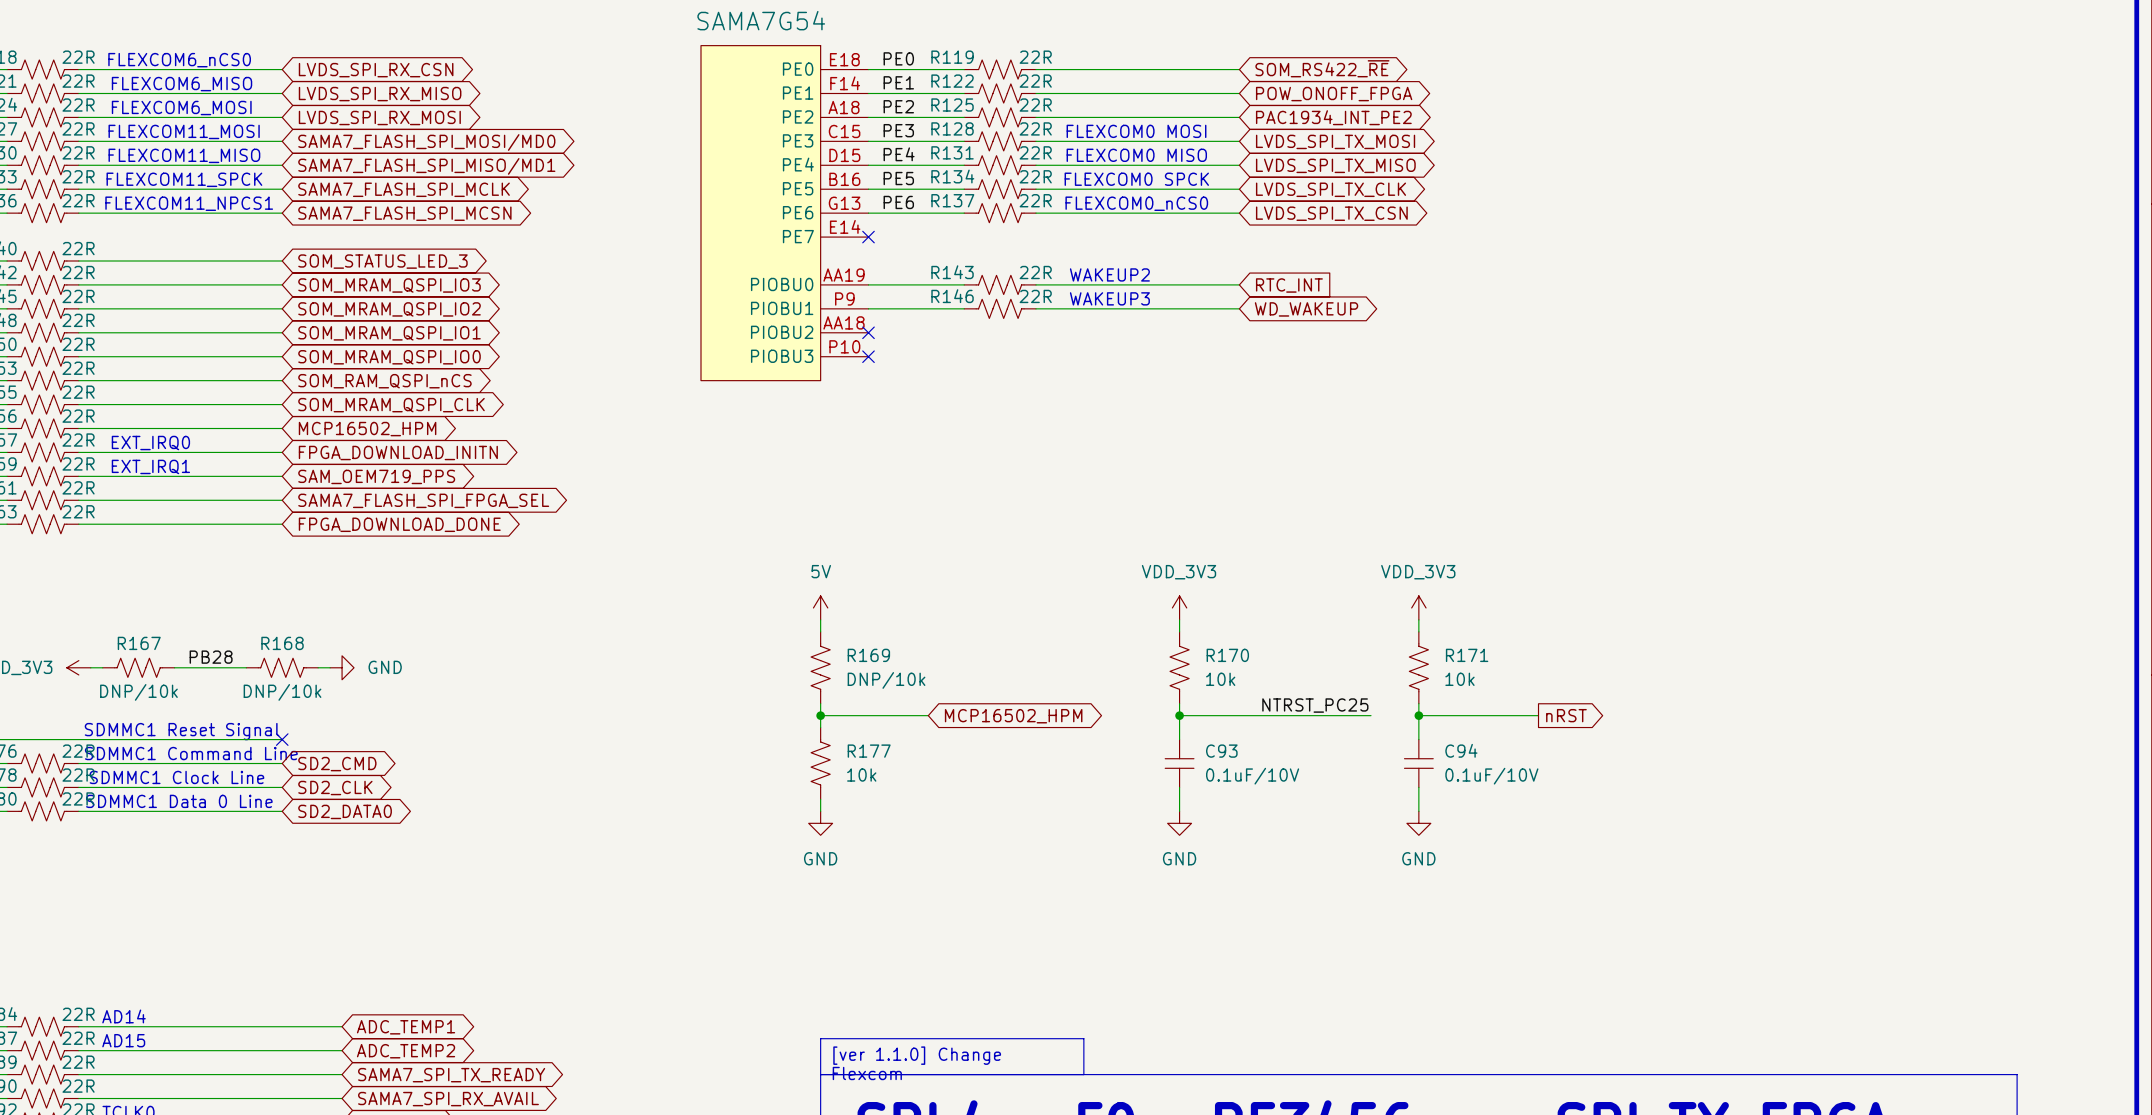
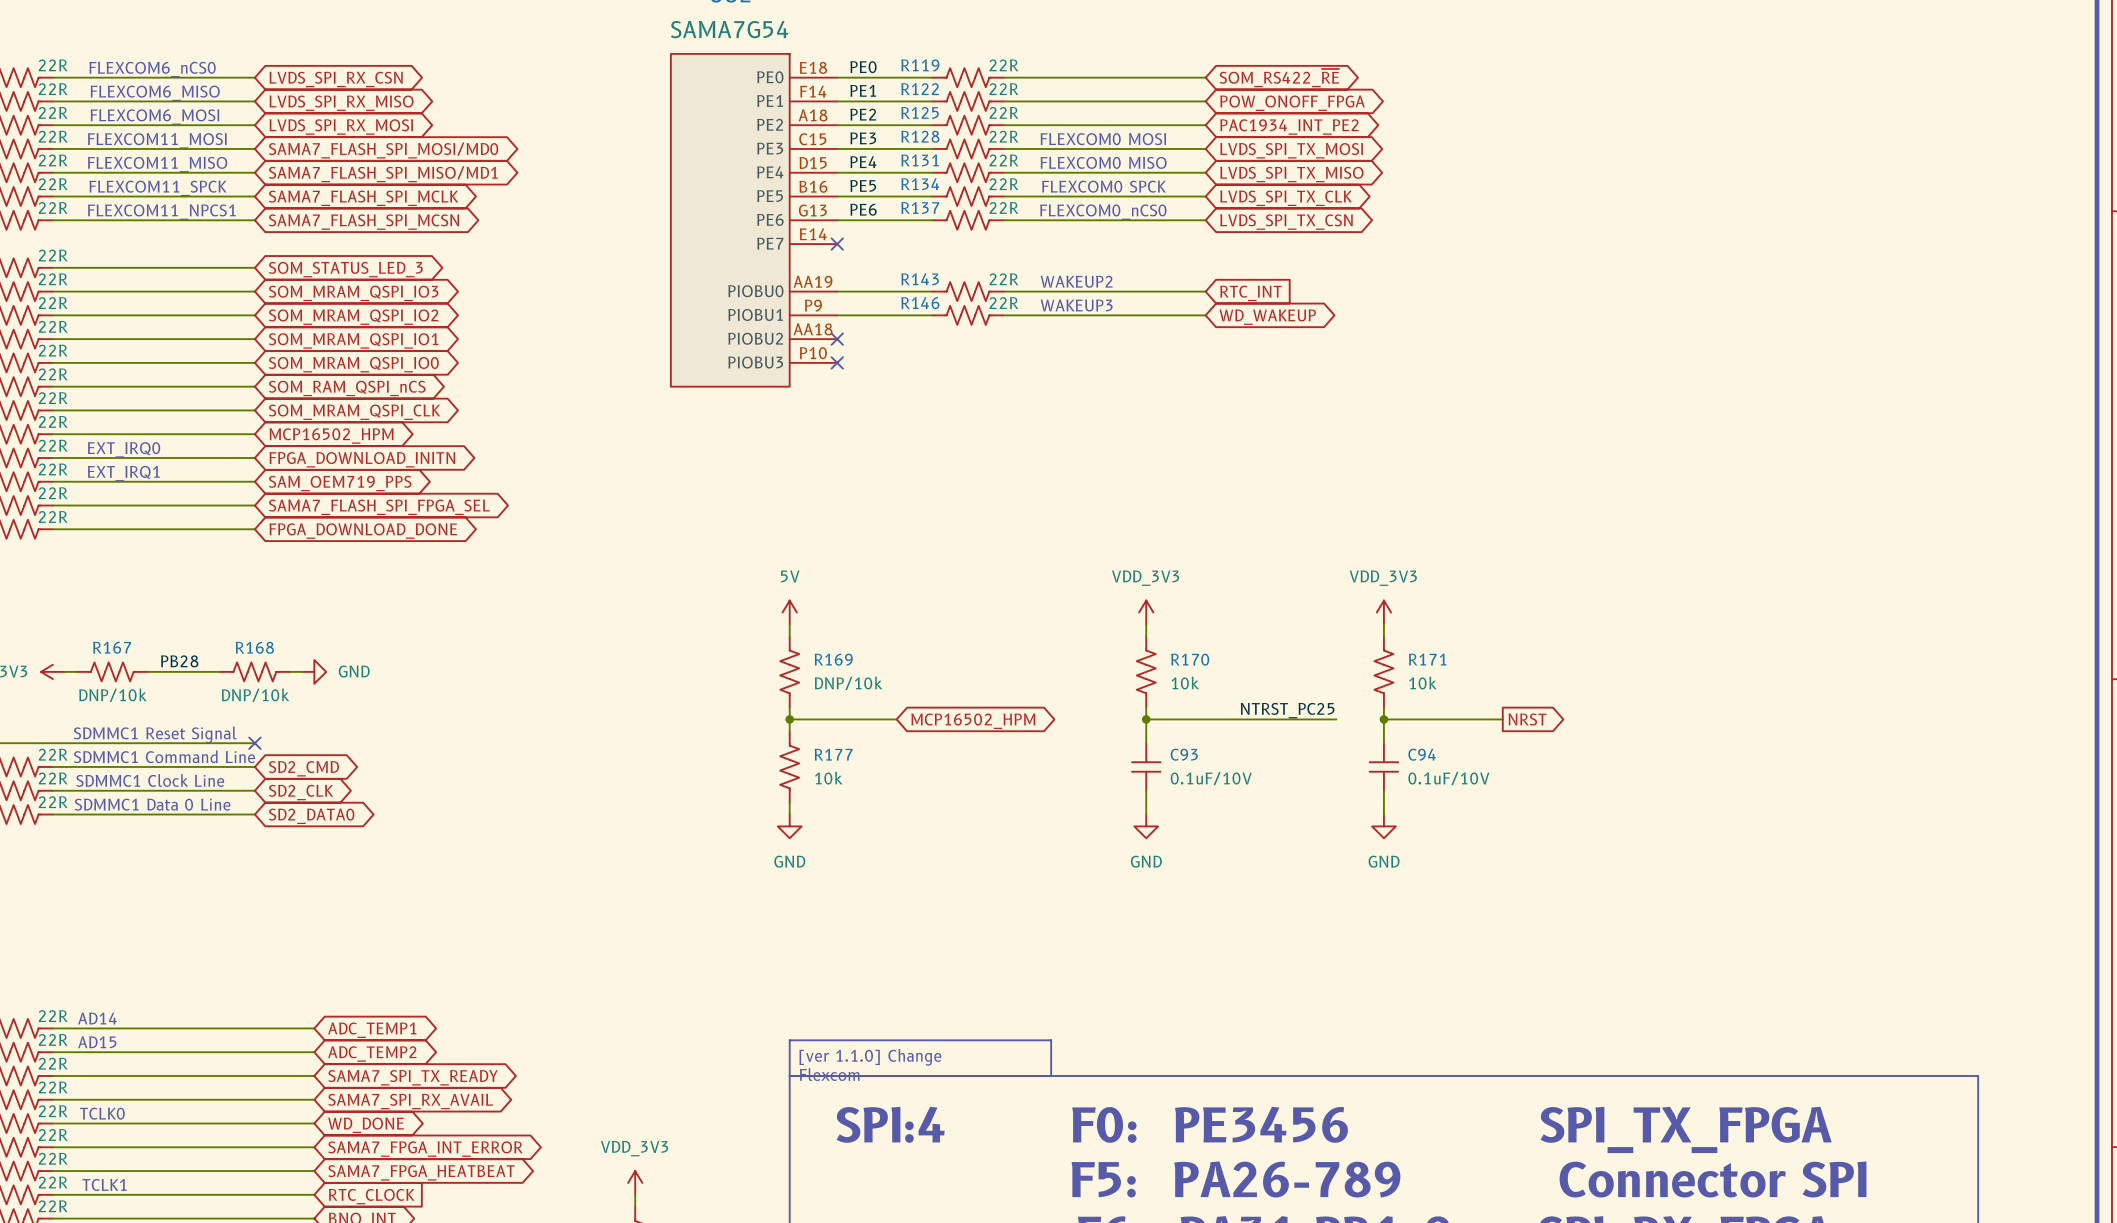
global label: nRST (1566, 715) -> NRST (1527, 719)

